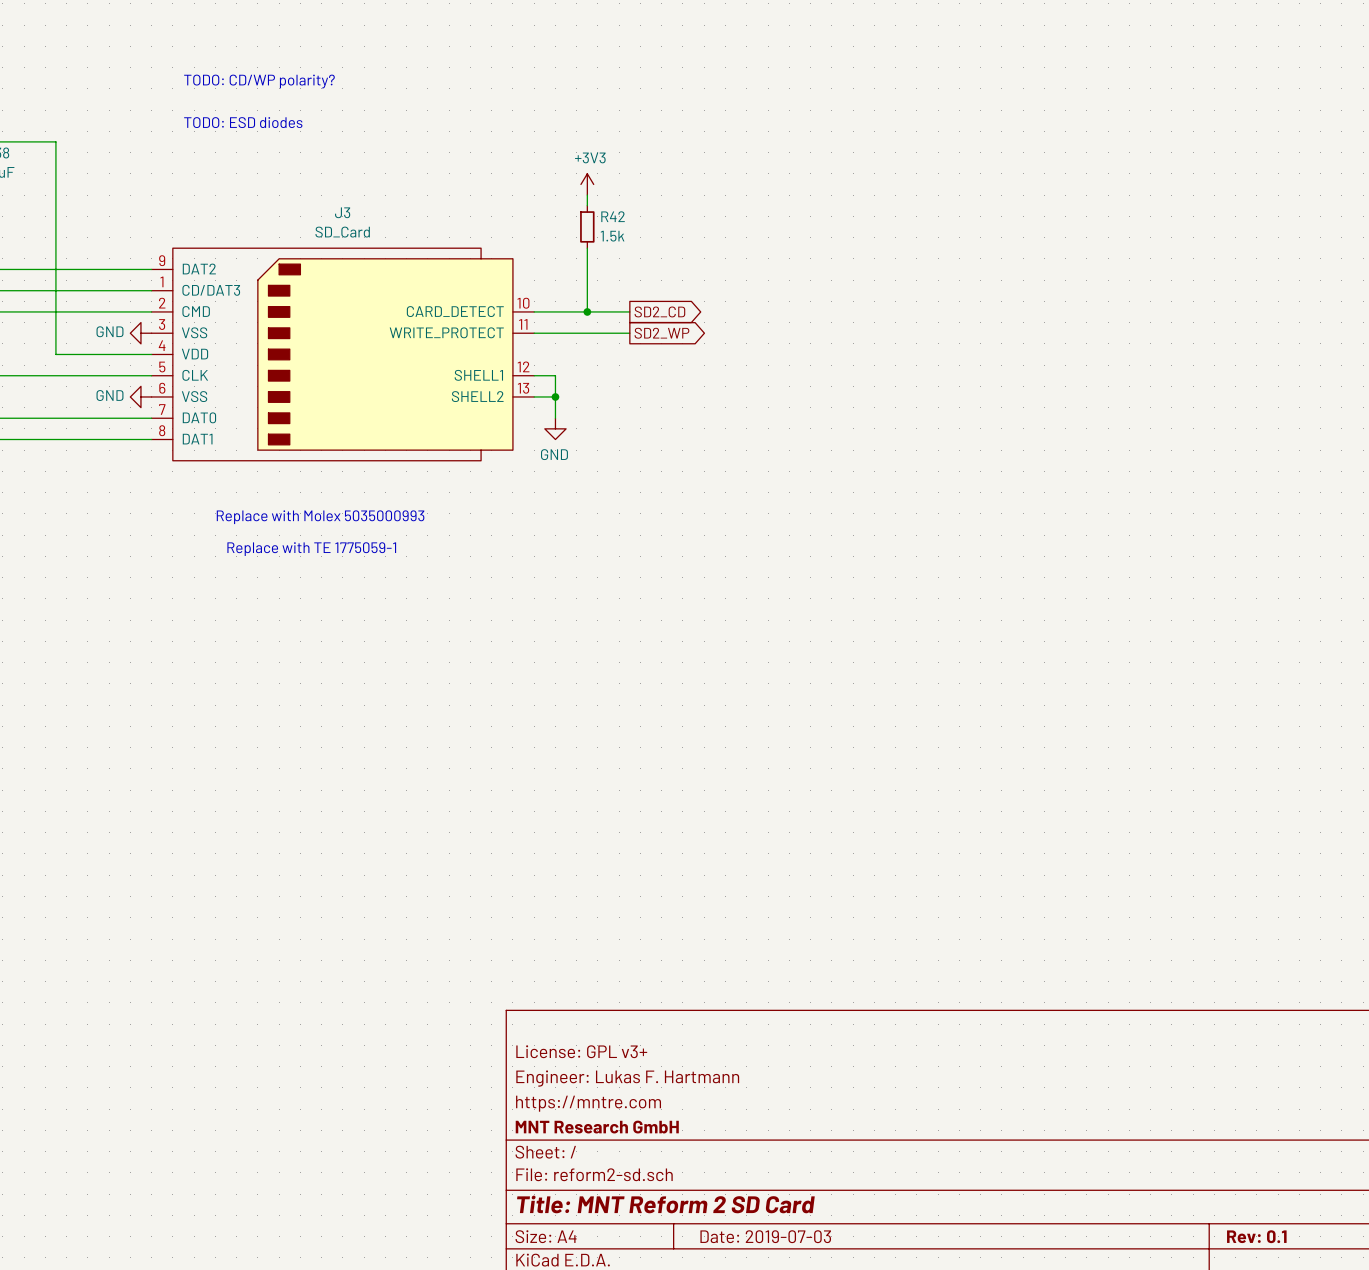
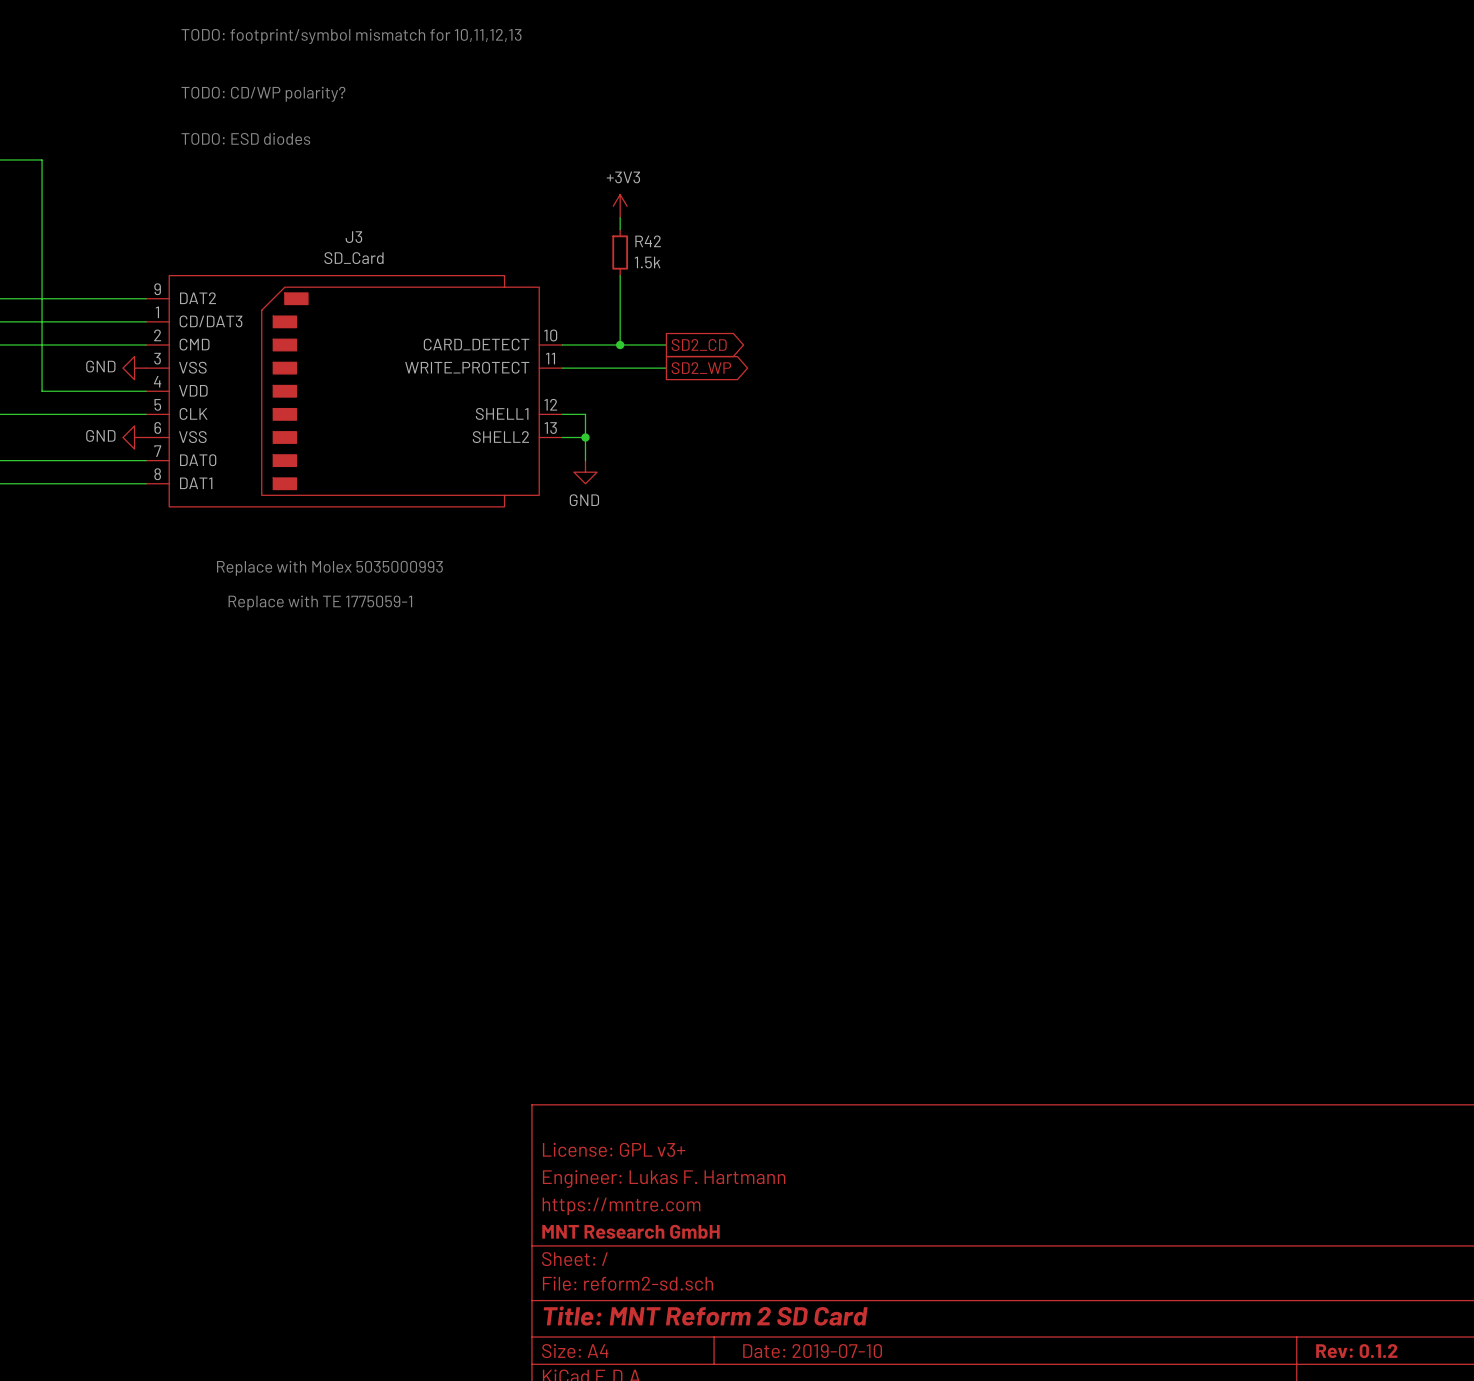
text: none -> TODO: footprint/symbol mismatch for 10,11,12,13 (351, 36)
title block: Date: 2019-07-03 (765, 1236) -> Date: 2019-07-10 (812, 1351)
title block: Rev: 0.1 (1256, 1236) -> Rev: 0.1.2 (1356, 1351)

